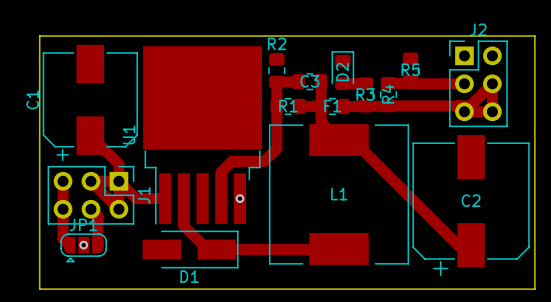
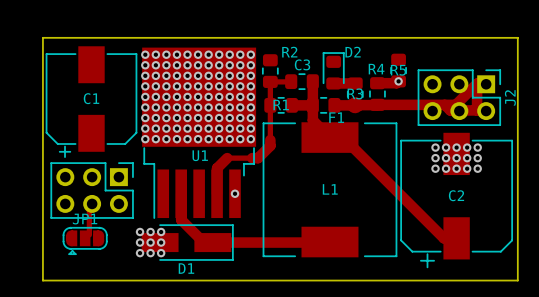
R2 name position: R2 (277, 43) -> R2 (289, 52)
via: none -> (145, 54)
via: none -> (155, 54)
via: none -> (166, 54)
via: none -> (176, 54)
via: none -> (187, 54)
via: none -> (198, 54)
via: none -> (208, 54)
via: none -> (219, 54)
via: none -> (229, 54)
via: none -> (240, 54)
via: none -> (250, 54)
via: none -> (145, 65)
via: none -> (155, 65)
via: none -> (166, 65)
via: none -> (176, 65)
via: none -> (187, 65)
via: none -> (198, 65)
via: none -> (208, 65)
via: none -> (219, 65)
via: none -> (229, 65)
via: none -> (240, 65)
via: none -> (250, 65)
D2 name rotation: 0° (342, 72) -> 90° clockwise (353, 52)
D2 name position: D2 (342, 72) -> D2 (353, 52)
via: none -> (145, 75)
via: none -> (155, 75)
via: none -> (166, 75)
via: none -> (176, 75)
via: none -> (187, 75)
via: none -> (198, 75)
via: none -> (208, 75)
via: none -> (219, 75)
via: none -> (229, 75)
via: none -> (240, 75)
via: none -> (250, 75)
track width: thick (298, 81) (276, 81) (276, 142) -> thin (291, 81) (270, 81) (270, 140)
C3 name position: C3 (309, 81) -> C3 (302, 64)
track: (410, 81) (412, 83) (464, 83) -> none
via: none -> (398, 81)
J2 rotation: 0° (478, 83) -> 90° clockwise (459, 97)
via: none -> (145, 86)
via: none -> (155, 86)
via: none -> (166, 86)
via: none -> (176, 86)
via: none -> (187, 86)
via: none -> (198, 86)
via: none -> (208, 86)
via: none -> (219, 86)
via: none -> (229, 86)
via: none -> (240, 86)
via: none -> (250, 86)
R4 name rotation: 0° (387, 94) -> 90° clockwise (376, 69)
via: none -> (145, 96)
via: none -> (155, 96)
via: none -> (166, 96)
via: none -> (176, 96)
via: none -> (187, 96)
via: none -> (198, 96)
via: none -> (208, 96)
via: none -> (219, 96)
via: none -> (229, 96)
via: none -> (240, 96)
via: none -> (250, 96)
C1 name rotation: 0° (32, 99) -> 90° clockwise (91, 98)
C1 name position: C1 (32, 99) -> C1 (91, 98)
F1 name position: F1 (332, 106) -> F1 (336, 117)
via: none -> (145, 107)
via: none -> (155, 107)
via: none -> (166, 107)
via: none -> (176, 107)
via: none -> (187, 107)
via: none -> (198, 107)
via: none -> (208, 107)
via: none -> (219, 107)
via: none -> (229, 107)
via: none -> (240, 107)
via: none -> (250, 107)
via: none -> (145, 118)
via: none -> (155, 118)
via: none -> (166, 118)
via: none -> (176, 118)
via: none -> (187, 118)
via: none -> (198, 118)
via: none -> (208, 118)
via: none -> (219, 118)
via: none -> (229, 118)
via: none -> (240, 118)
via: none -> (250, 118)
via: none -> (145, 128)
via: none -> (155, 128)
via: none -> (166, 128)
via: none -> (176, 128)
via: none -> (187, 128)
via: none -> (198, 128)
via: none -> (208, 128)
via: none -> (219, 128)
via: none -> (229, 128)
via: none -> (240, 128)
via: none -> (250, 128)
U1 name rotation: 0° (128, 134) -> 90° clockwise (200, 155)
U1 name position: U1 (128, 134) -> U1 (200, 155)
track: (90, 135) (118, 164) (118, 209) (90, 181) (118, 181) (136, 198) (165, 198) -> none
via: none -> (145, 139)
via: none -> (155, 139)
via: none -> (166, 139)
via: none -> (176, 139)
via: none -> (187, 139)
via: none -> (198, 139)
via: none -> (208, 139)
via: none -> (219, 139)
via: none -> (229, 139)
via: none -> (240, 139)
via: none -> (250, 139)
via: none -> (435, 147)
via: none -> (446, 147)
via: none -> (456, 147)
via: none -> (467, 147)
via: none -> (477, 147)
track width: thick (231, 161) (257, 161) -> thin (227, 158) (252, 158)
via: none -> (435, 158)
via: none -> (446, 158)
via: none -> (456, 158)
via: none -> (467, 158)
via: none -> (477, 158)
via: none -> (435, 168)
via: none -> (446, 168)
via: none -> (456, 168)
via: none -> (467, 168)
via: none -> (477, 168)
track: (63, 181) (63, 238) (69, 245) -> none
J1 name: J1 (144, 195) -> none
track: (90, 209) (98, 216) (98, 245) -> none
track: none -> (90, 206) (89, 234)
via: none -> (140, 232)
via: none -> (150, 232)
via: none -> (161, 232)
via: (83, 245) -> none
via: none -> (140, 242)
via: none -> (150, 242)
via: none -> (161, 242)
via: none -> (140, 253)
via: none -> (150, 253)
via: none -> (161, 253)

